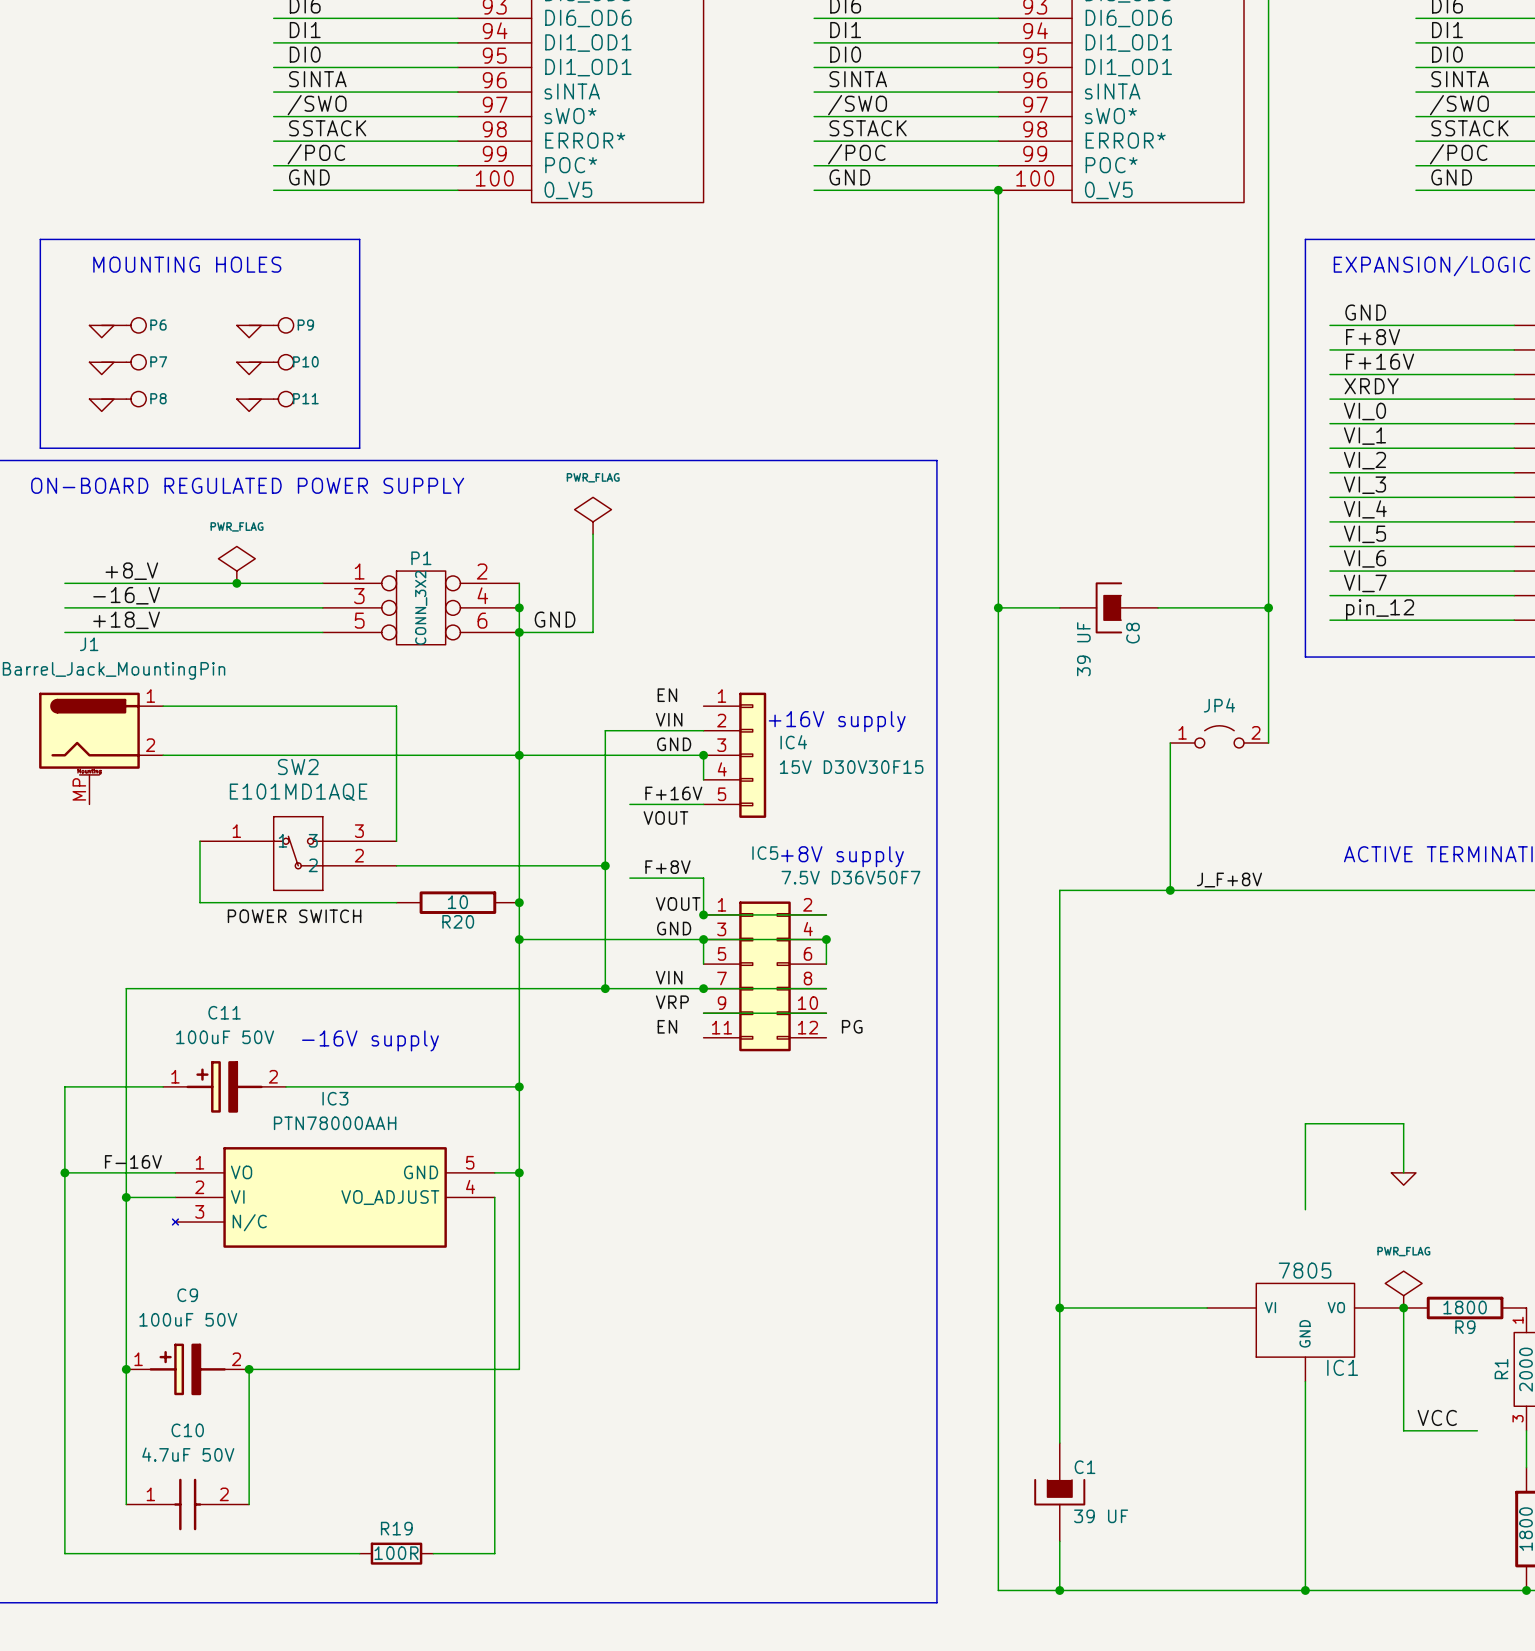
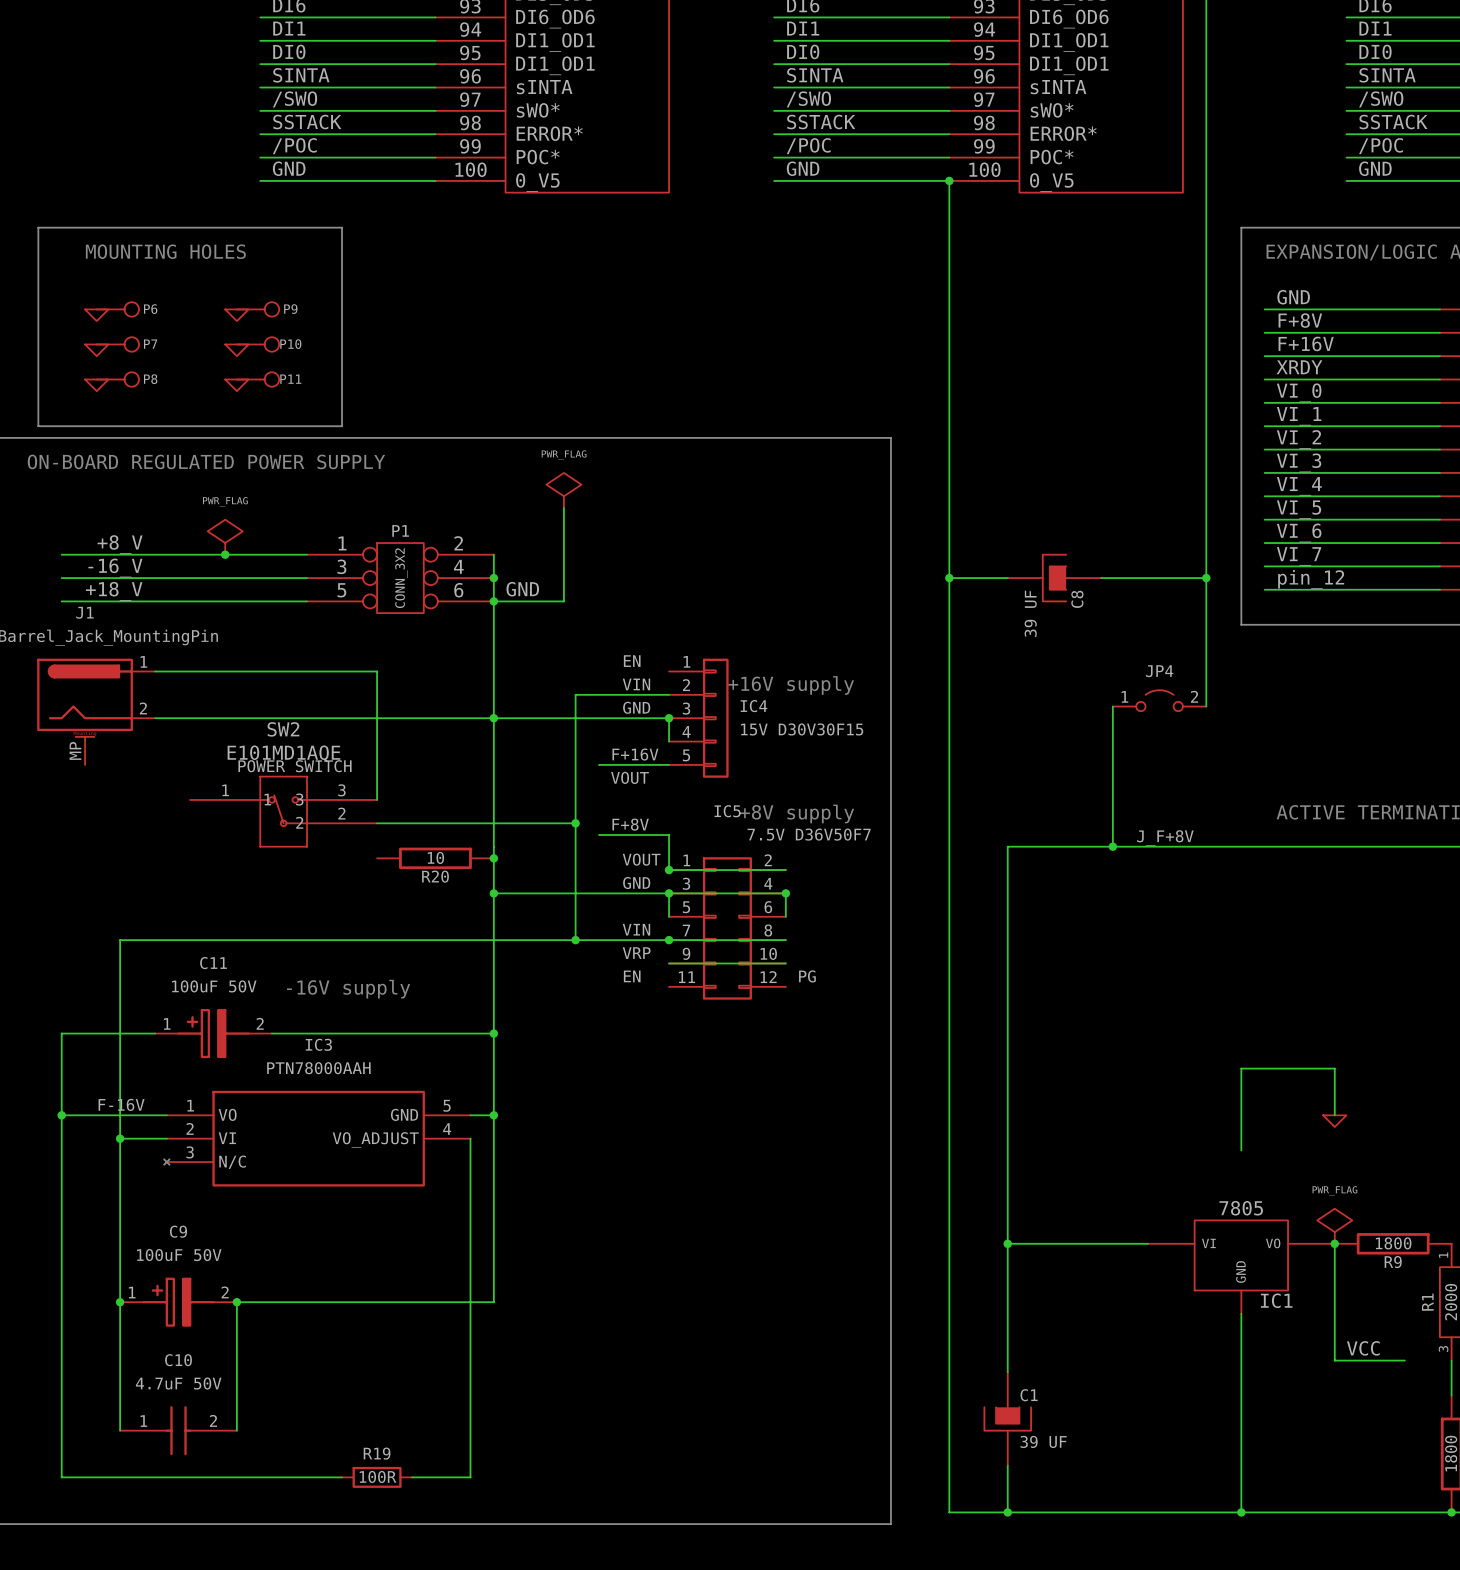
wire: (200, 841) (200, 902) (396, 902) -> none
label position: POWER SWITCH (294, 916) -> POWER SWITCH (295, 766)

